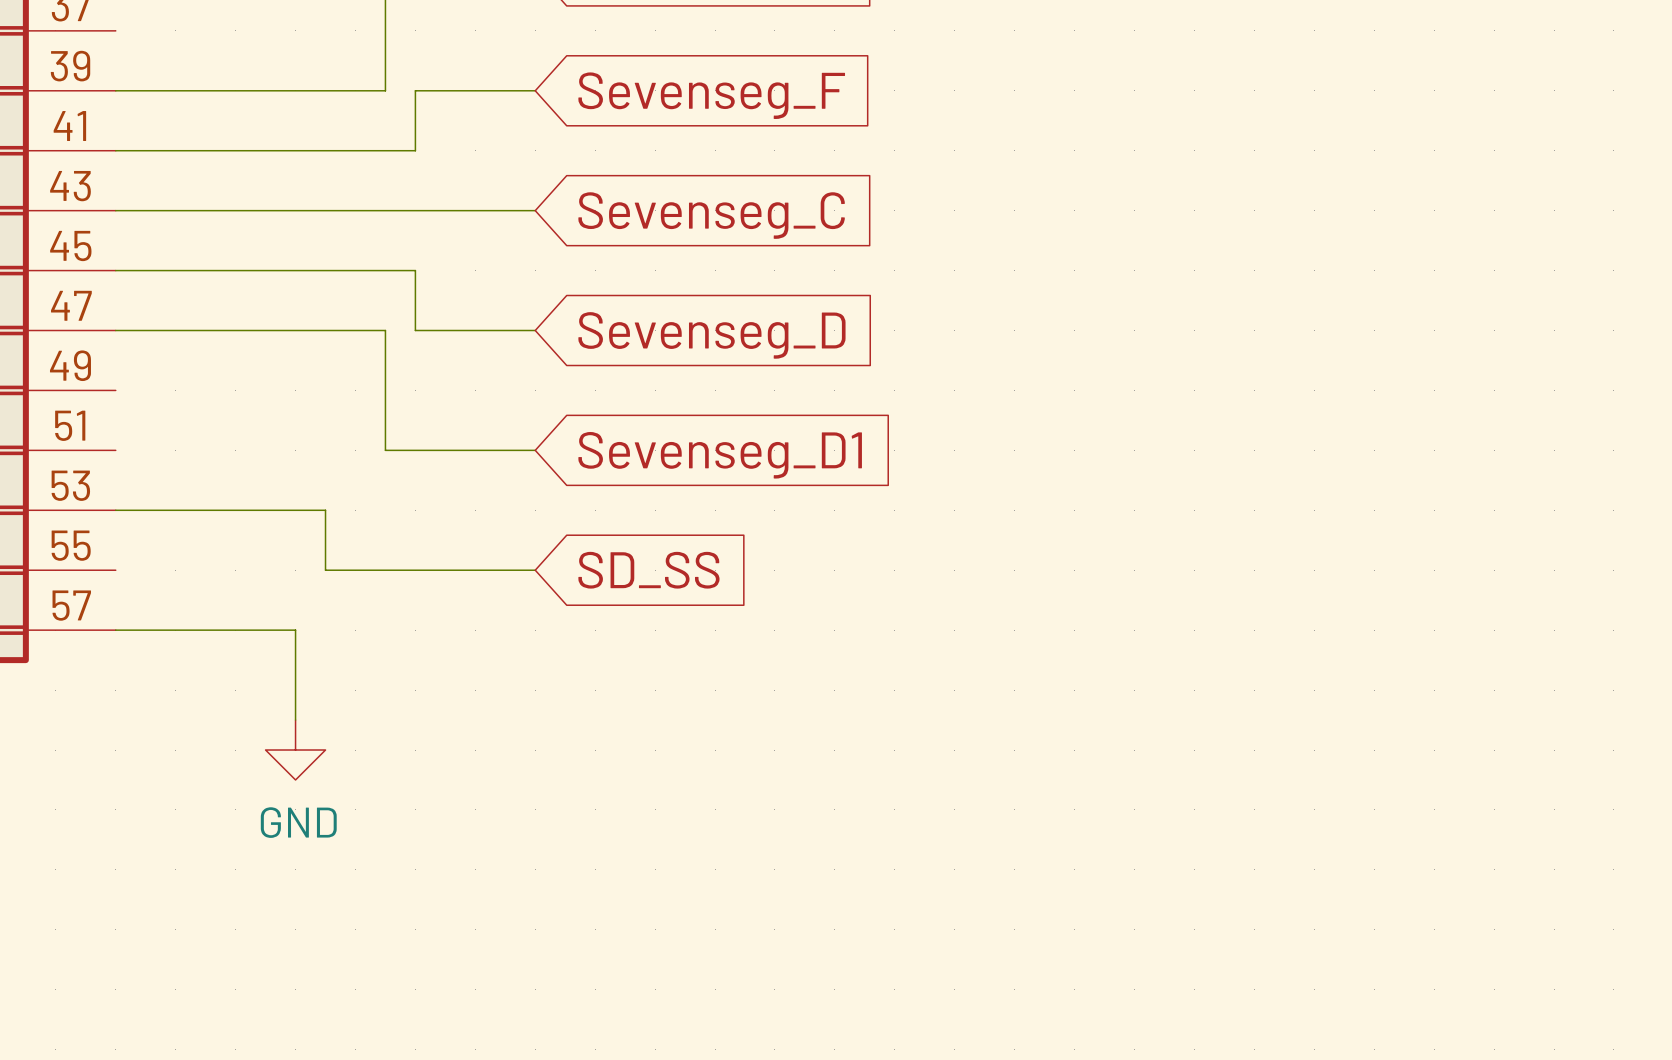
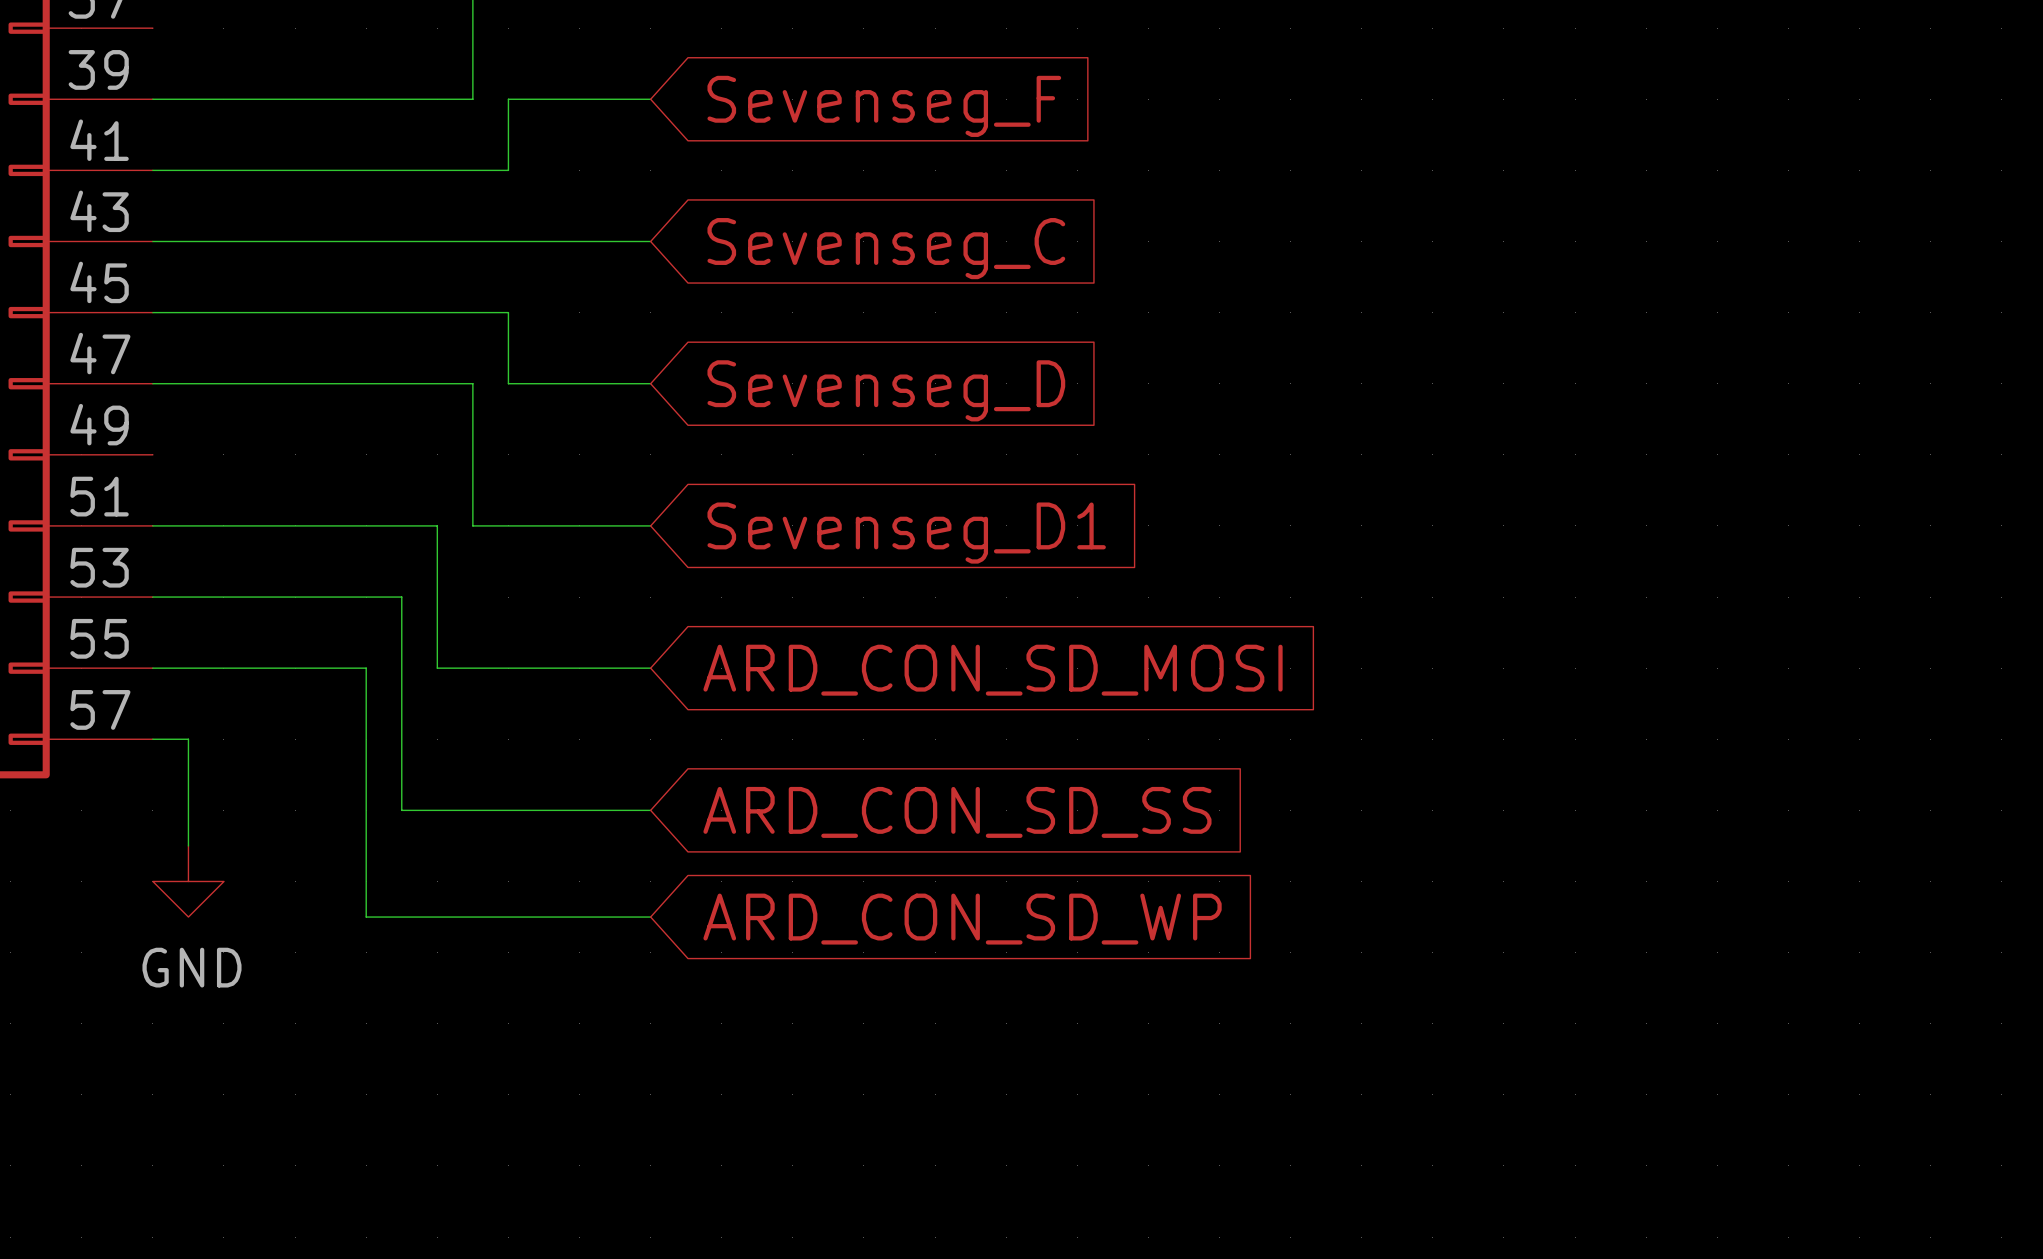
wire: none -> (152, 525) (437, 525) (437, 668)
wire: (325, 570) (355, 570) -> (401, 668) (401, 810) (650, 810)
global label: SD_SS (648, 570) -> ARD_CON_SD_MOSI (993, 670)
wire: (145, 630) (295, 630) -> (152, 668) (366, 668) (366, 739)
wire: none -> (188, 739) (188, 845)
global label: none -> ARD_CON_SD_SS (957, 812)
wire: none -> (366, 845) (366, 917) (650, 917)
power symbol position: GND (295, 750) -> GND (188, 881)
global label: none -> ARD_CON_SD_WP (962, 919)

